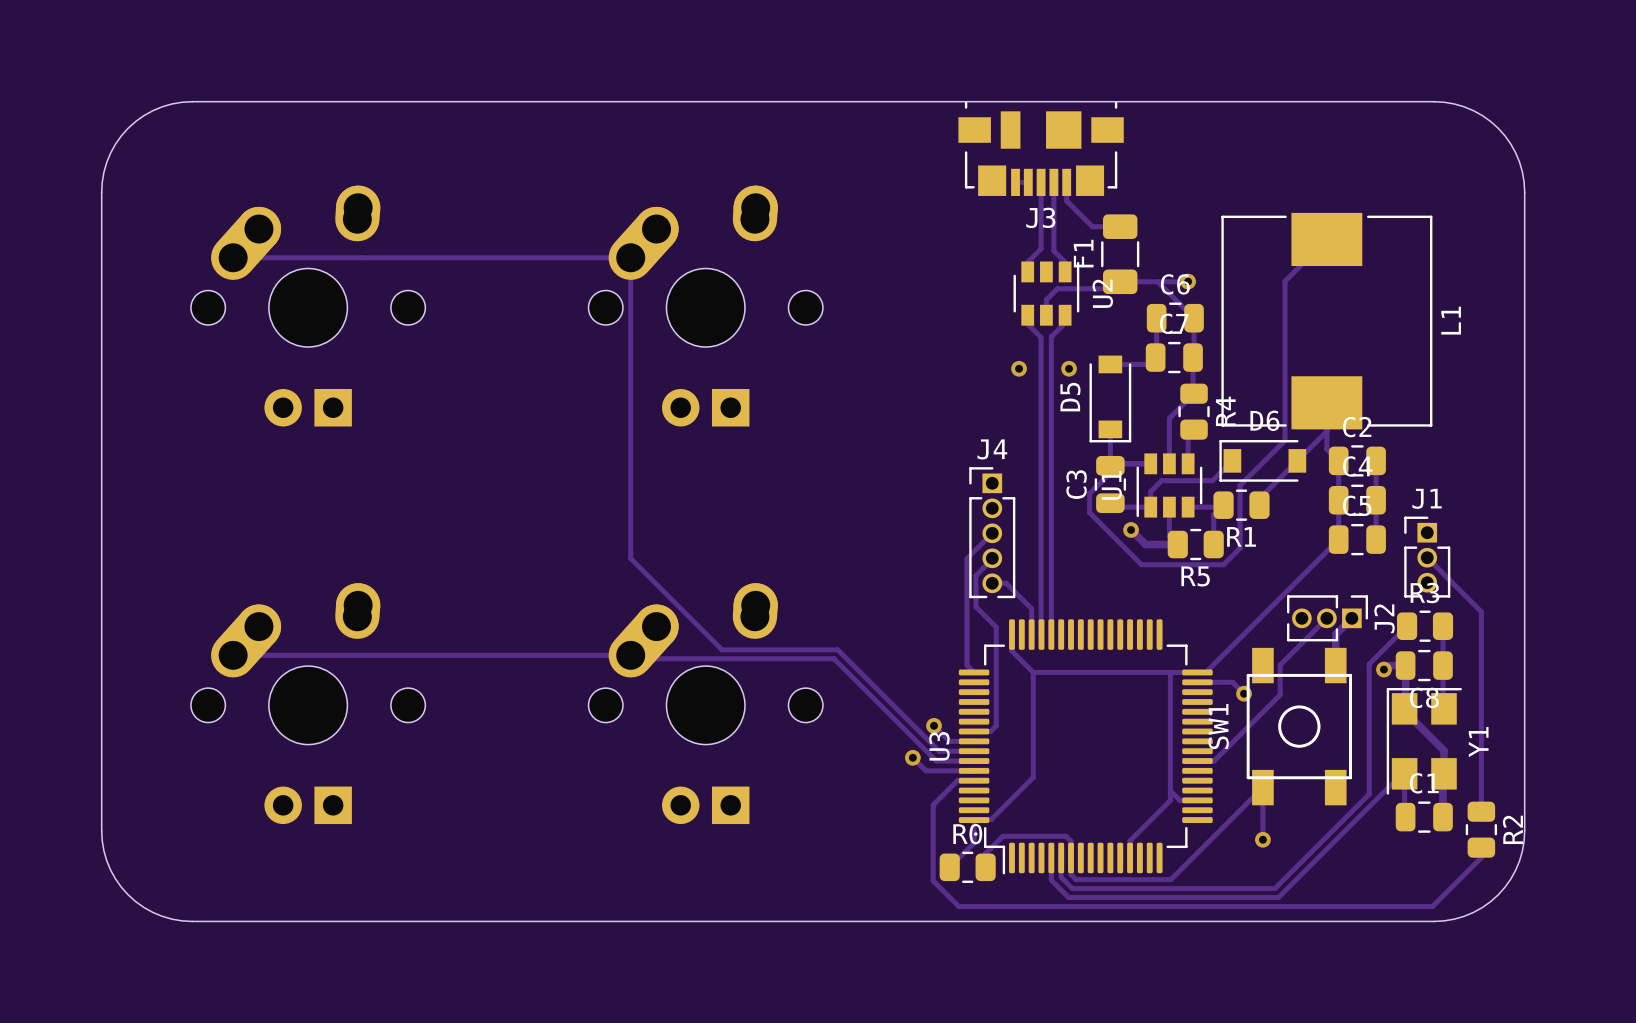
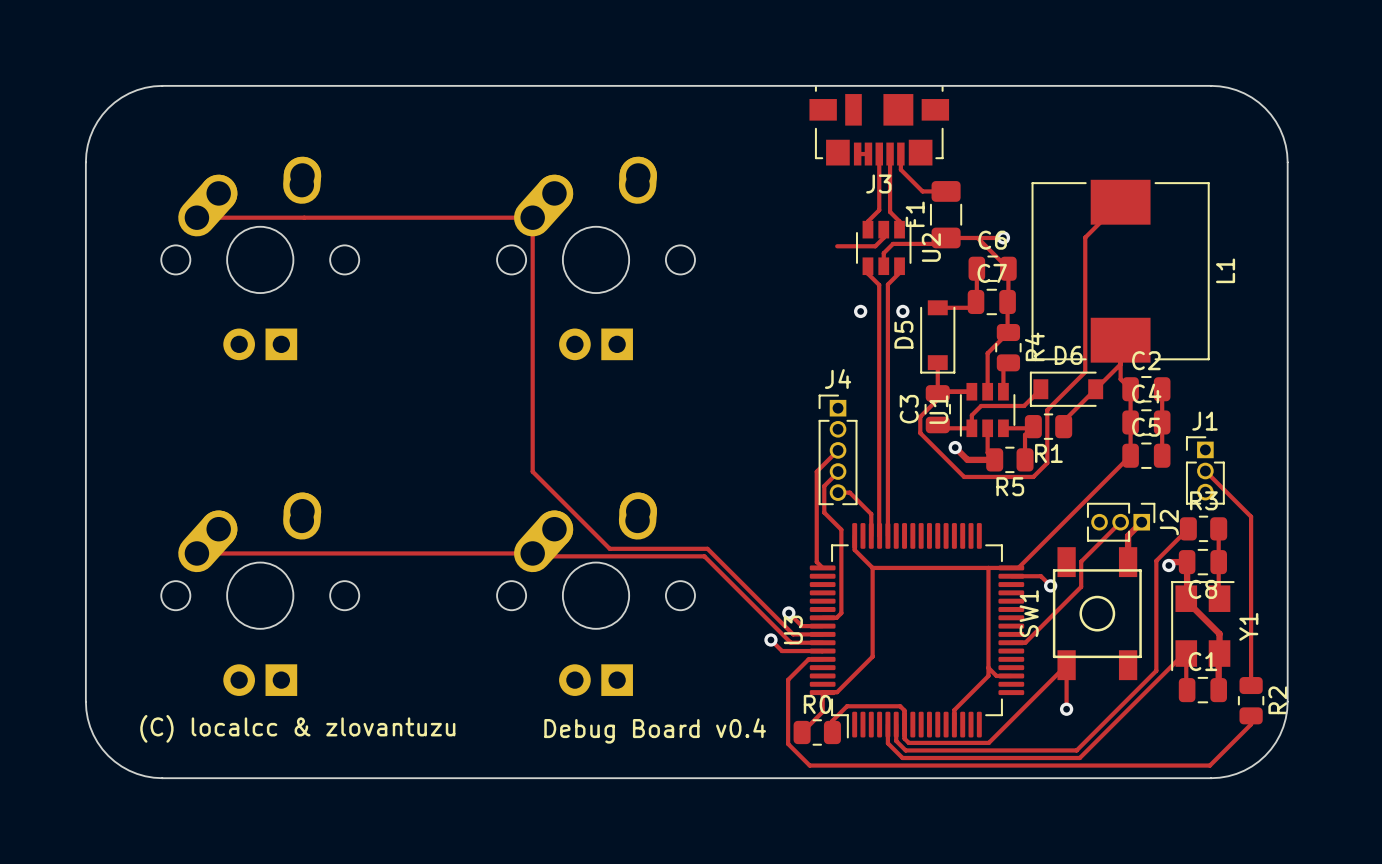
track: none -> (883, 229) (883, 237) (875, 246) (837, 246)
text: none -> (C) localcc & zlovantuzu (297, 728)
text: none -> Debug Board v0.4 (655, 730)

